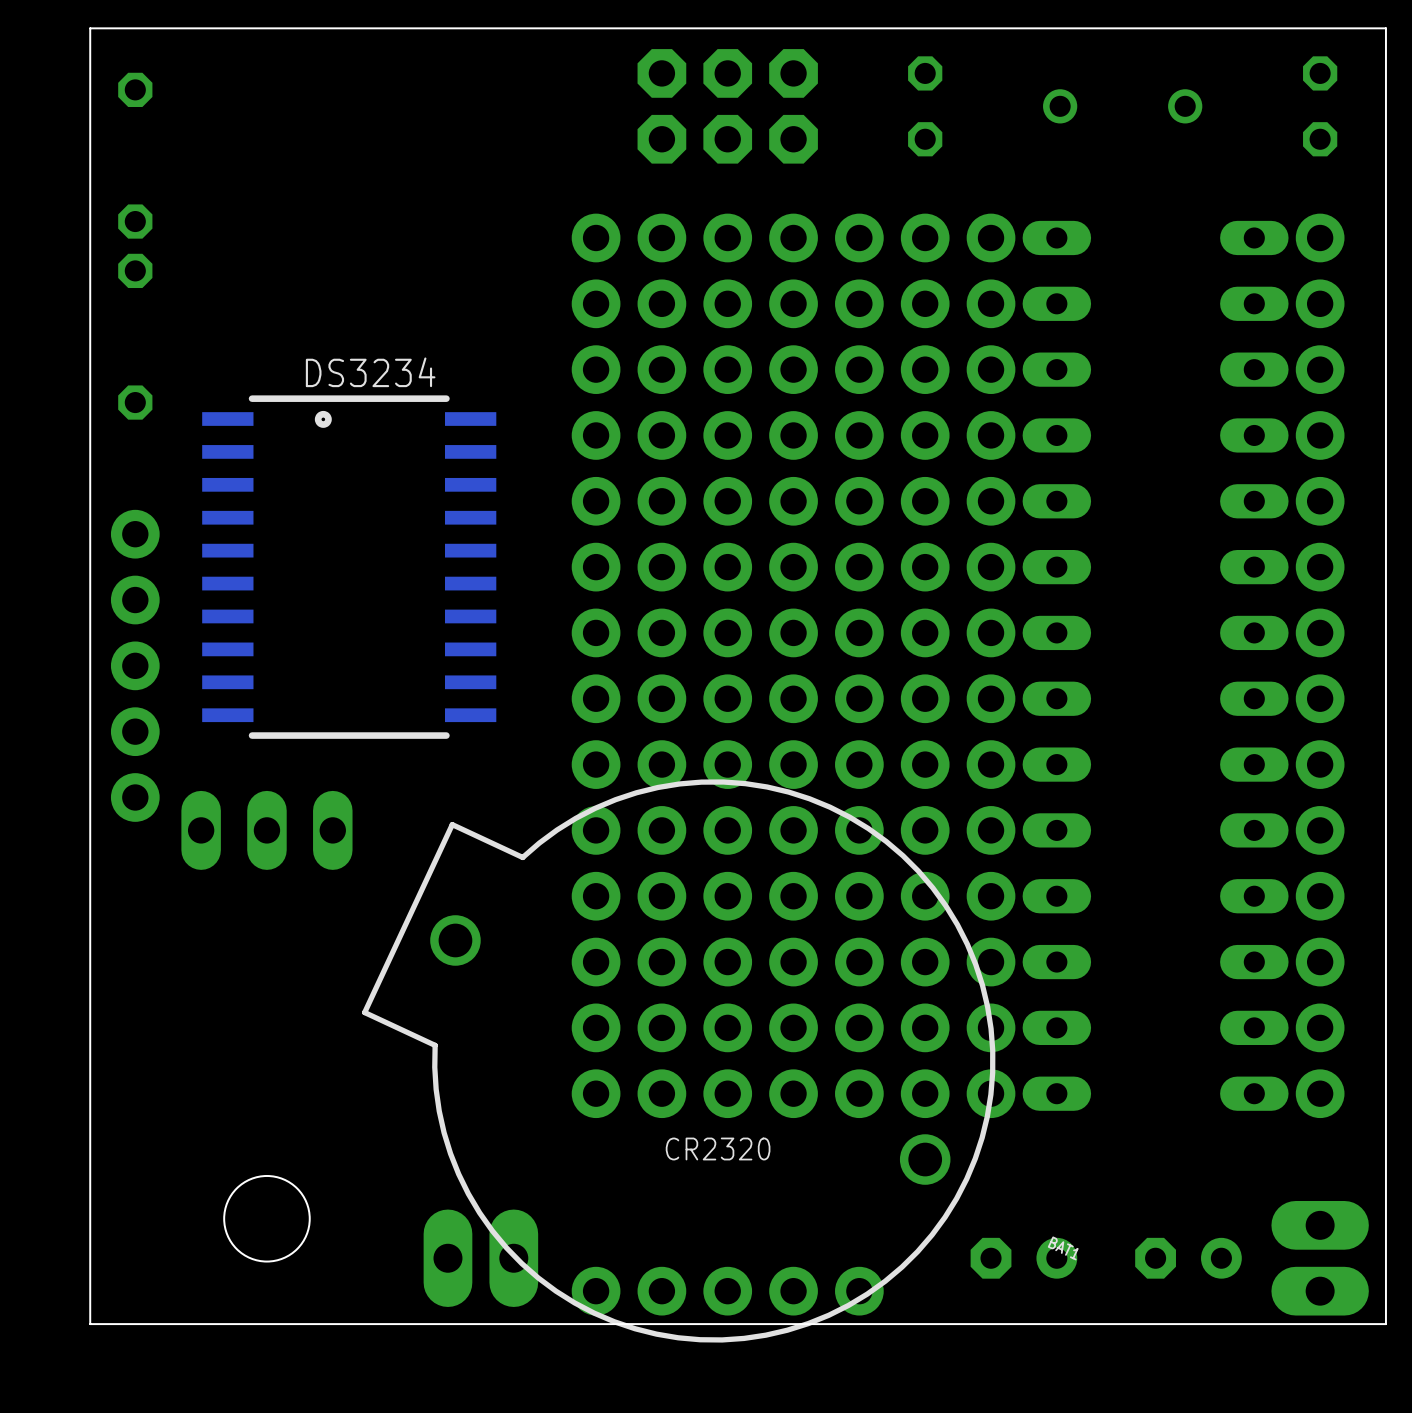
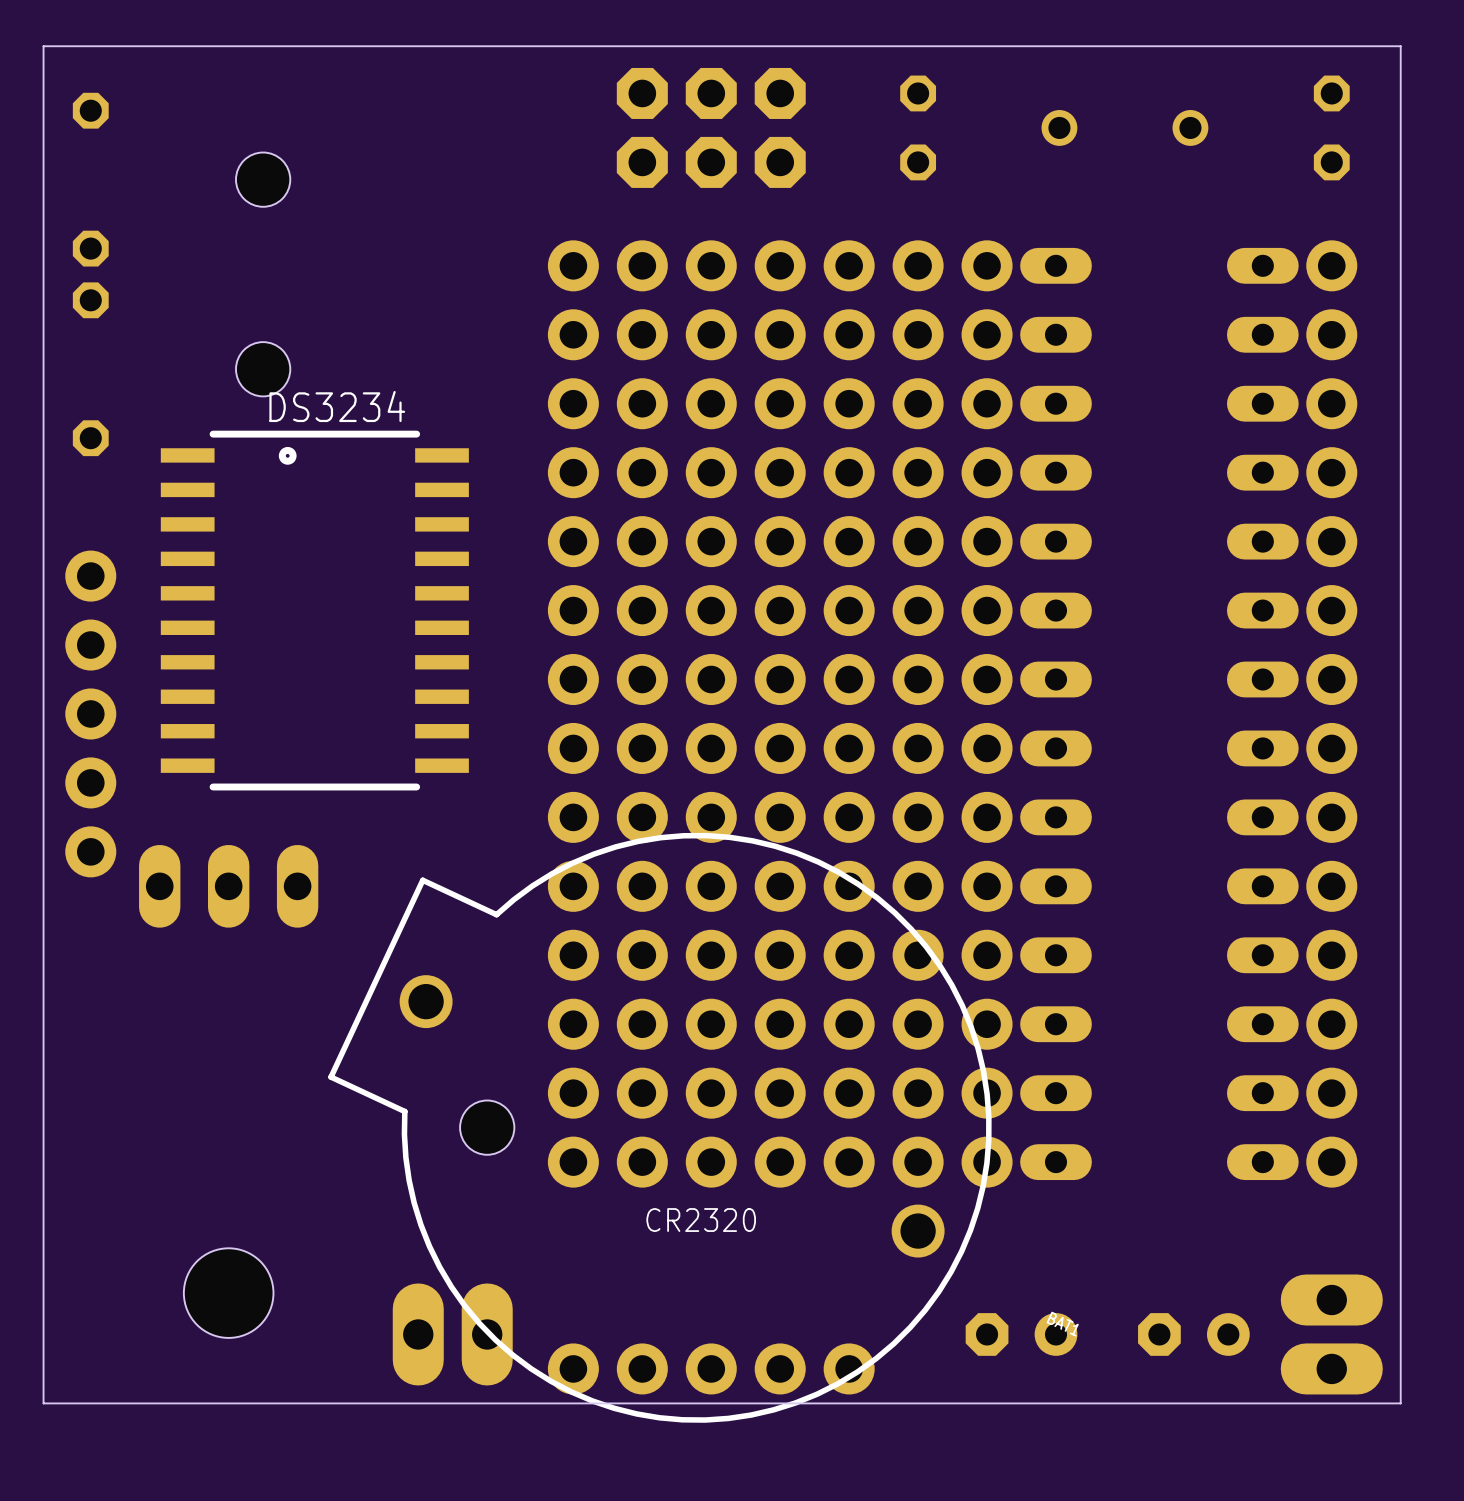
hole: none -> (263, 179)
hole: none -> (263, 369)
hole: none -> (487, 1127)

